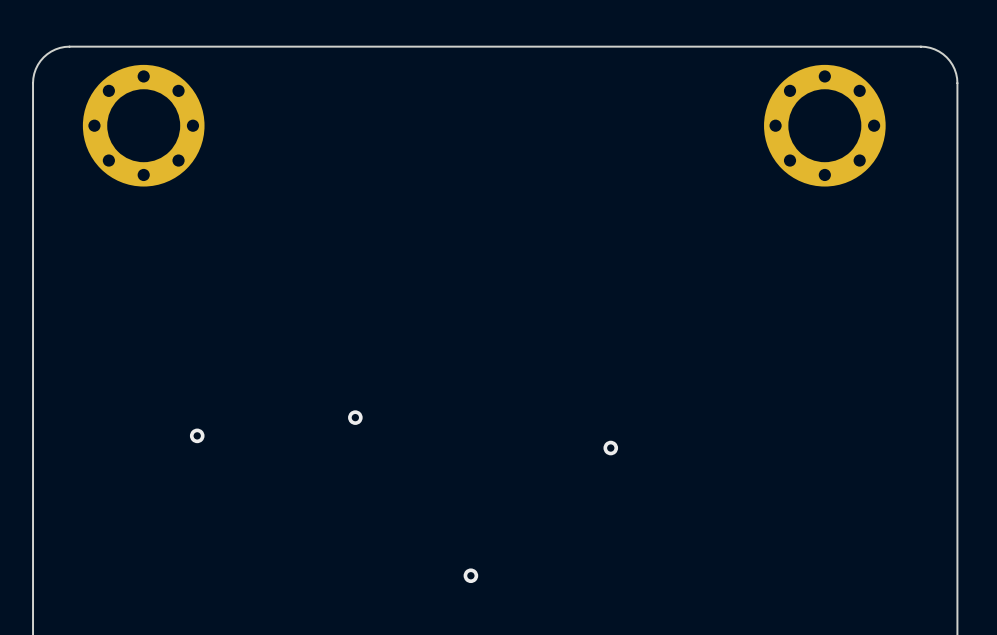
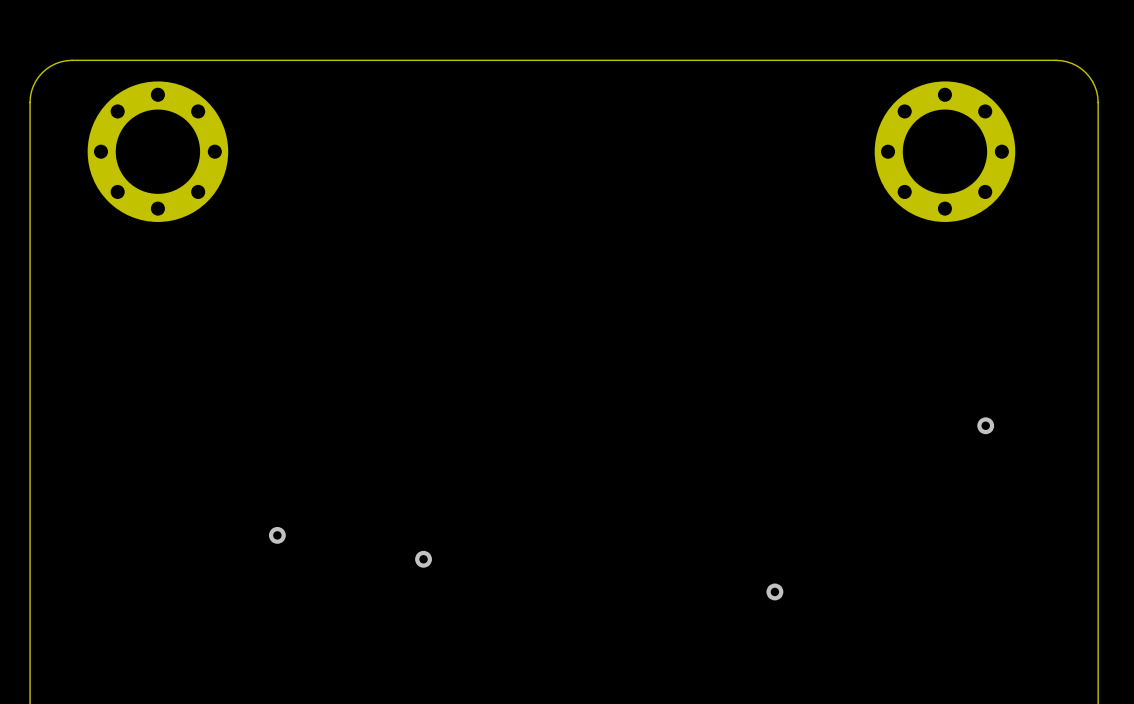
via: none -> (985, 425)
via: (355, 417) -> none
via position: (197, 435) -> (277, 535)
via position: (610, 448) -> (774, 591)
via: none -> (423, 559)
via: (470, 575) -> none

